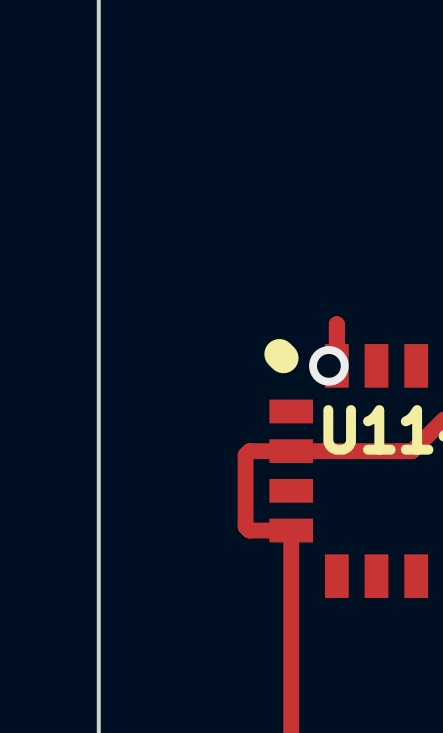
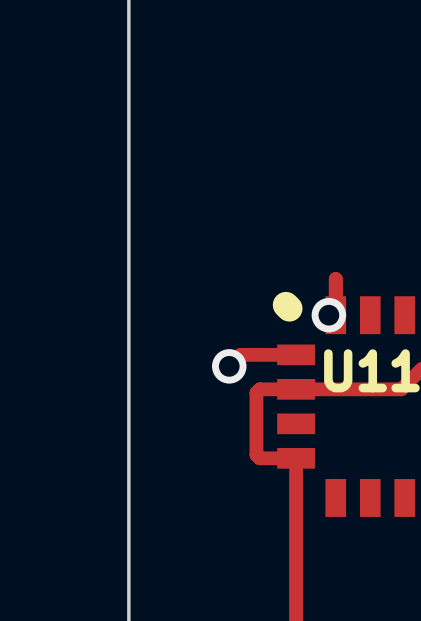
track: none -> (296, 354) (240, 354) (229, 366)
via: none -> (229, 366)

